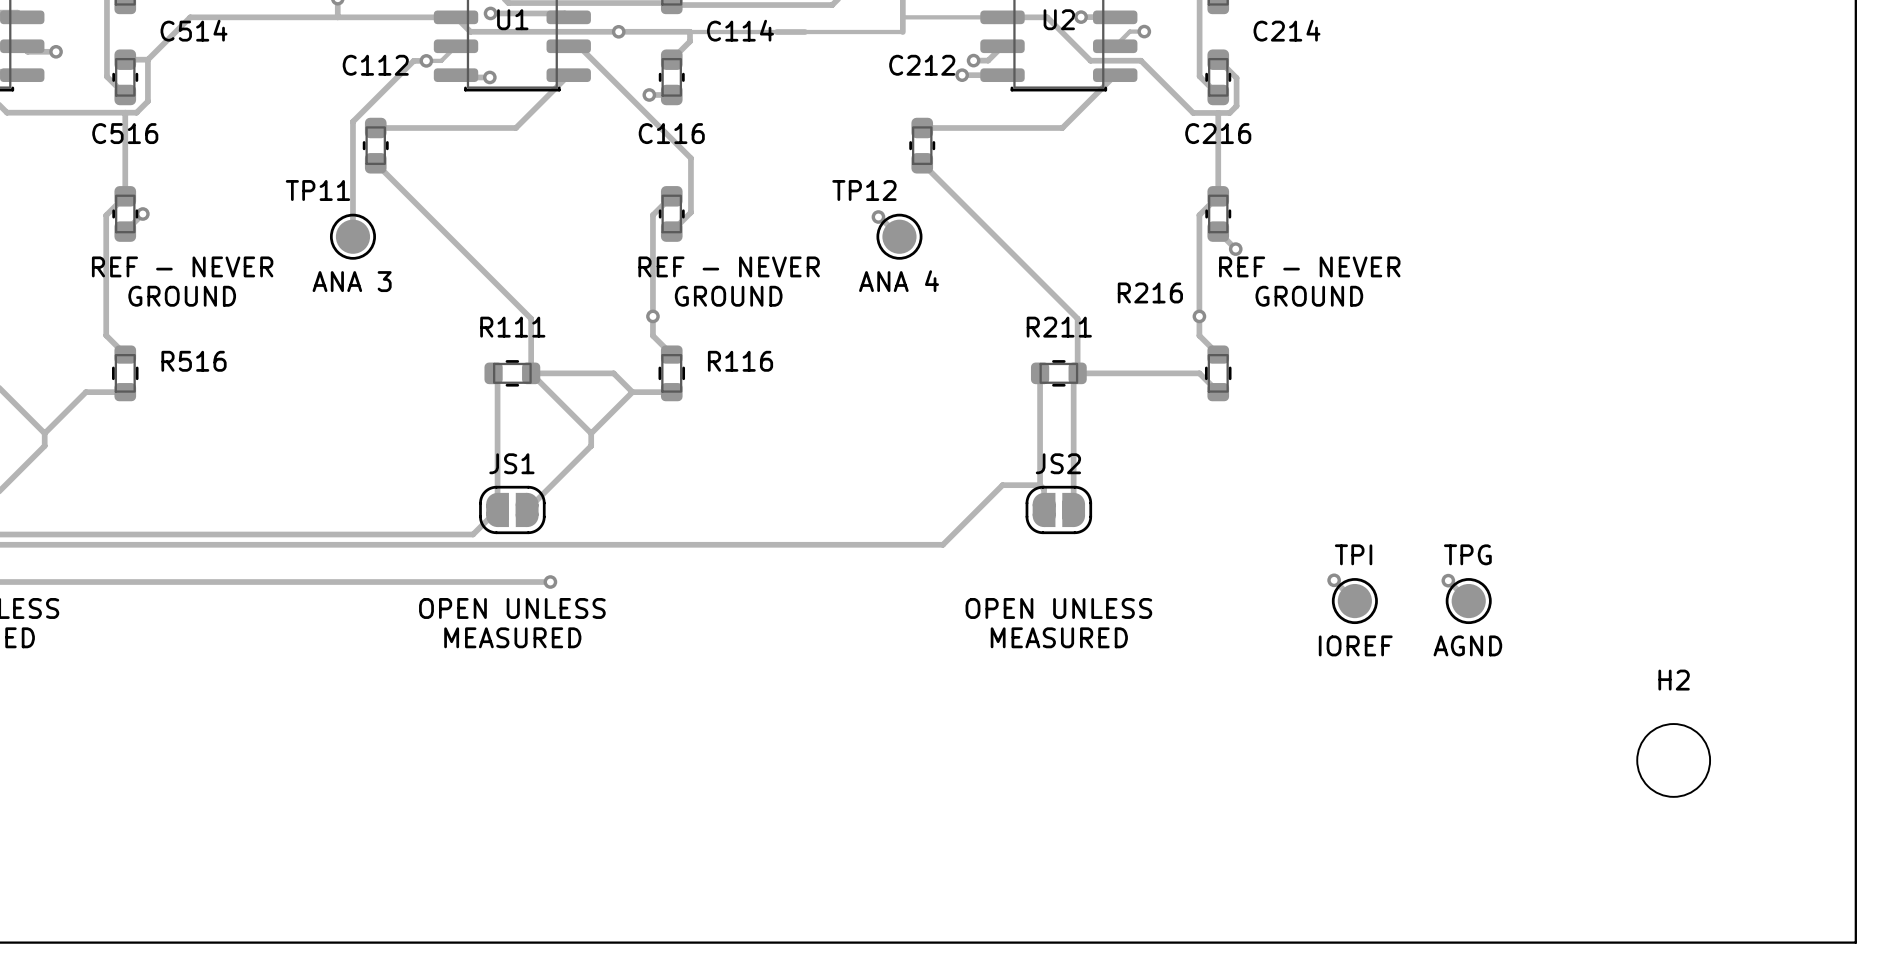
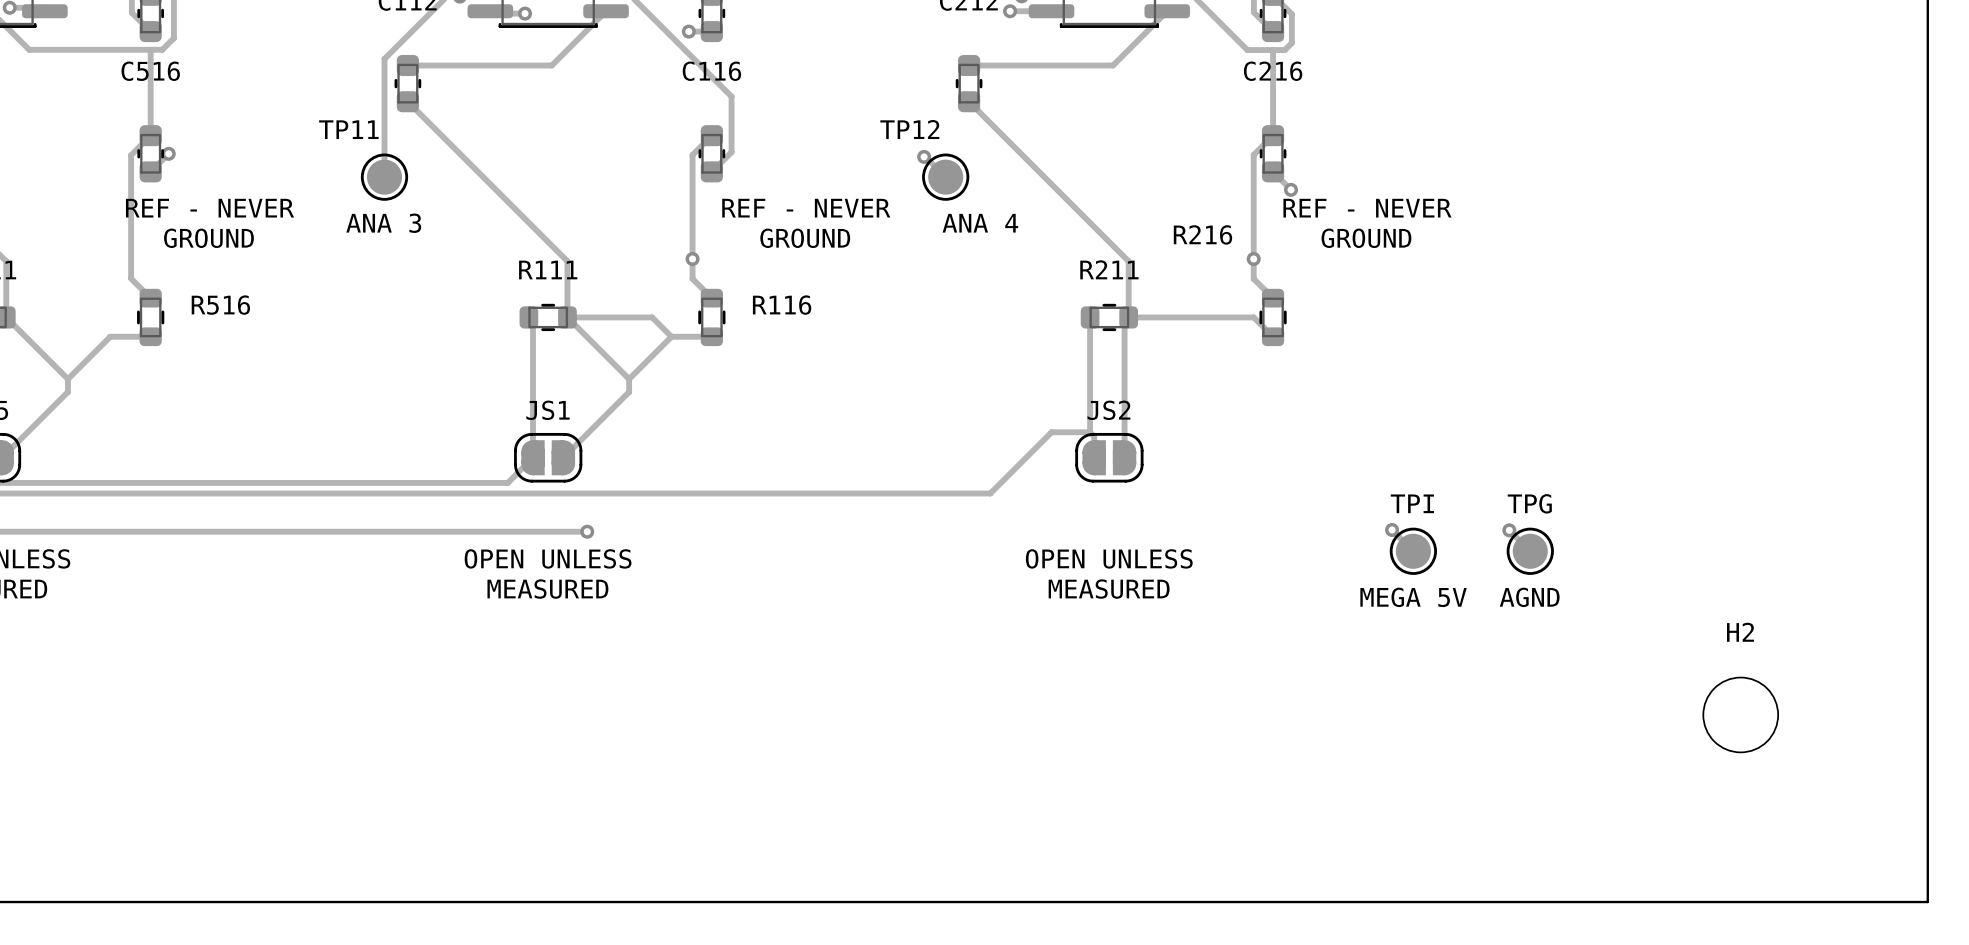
text position: REF - NEVER (729, 266) -> REF - NEVER (806, 208)
text position: ANA 4 (899, 281) -> ANA 4 (980, 223)
text position: GROUND (728, 296) -> GROUND (805, 238)
text: IOREF (1355, 645) -> MEGA 5V (1413, 597)

